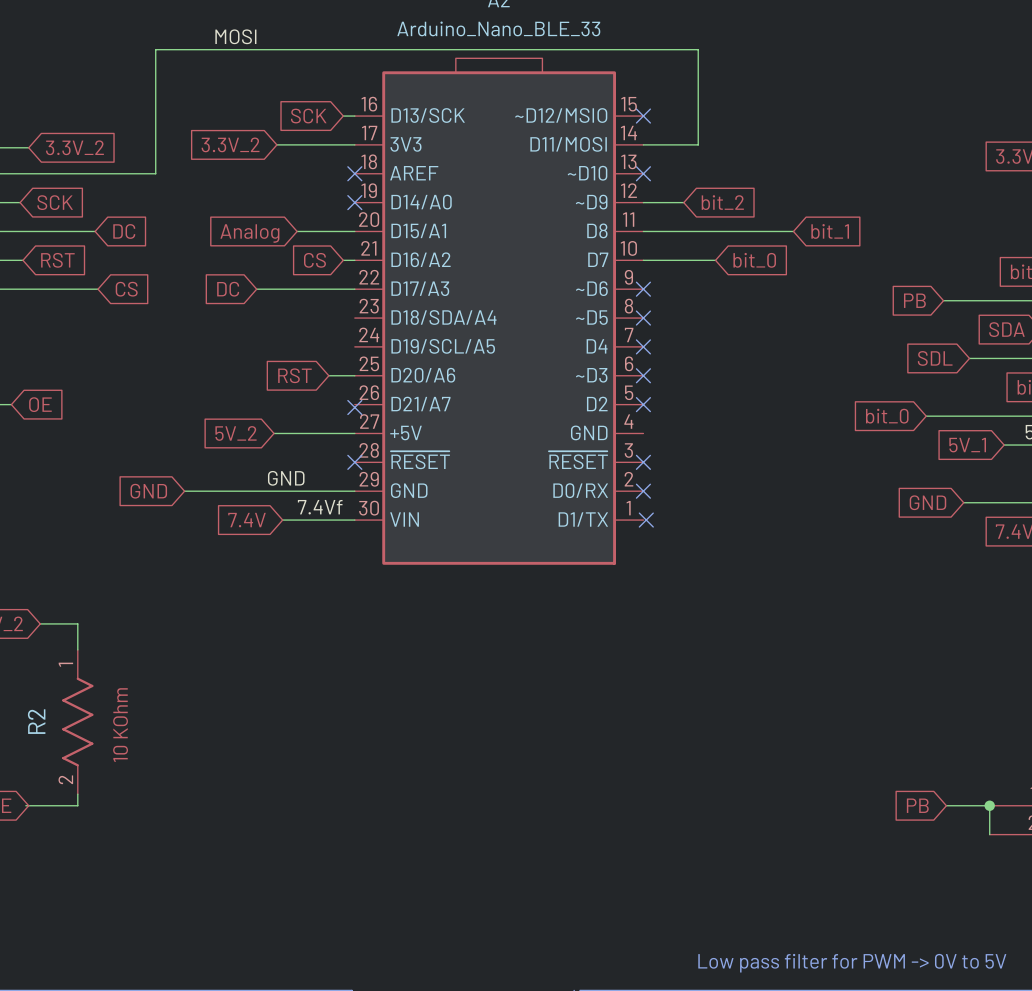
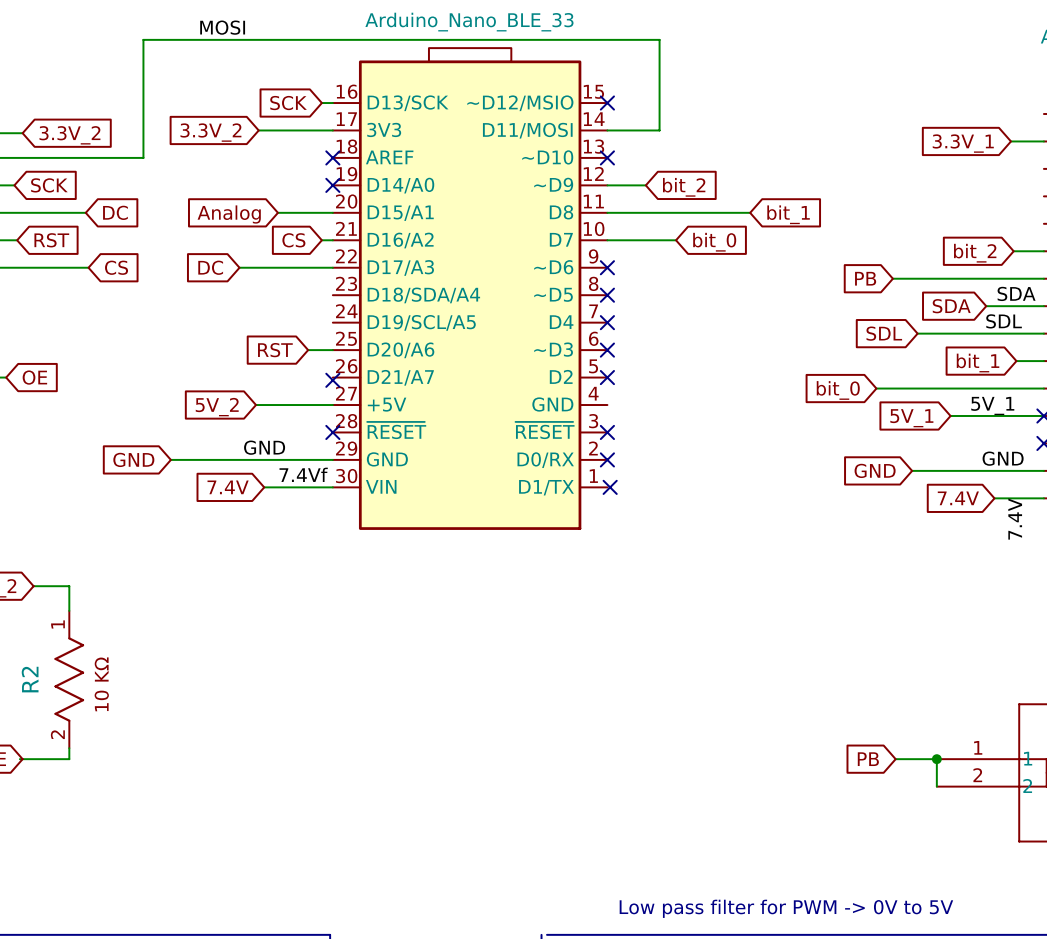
R2 text: 10 KOhm (120, 725) -> none
R2 text: none -> 10 KΩ (101, 684)

